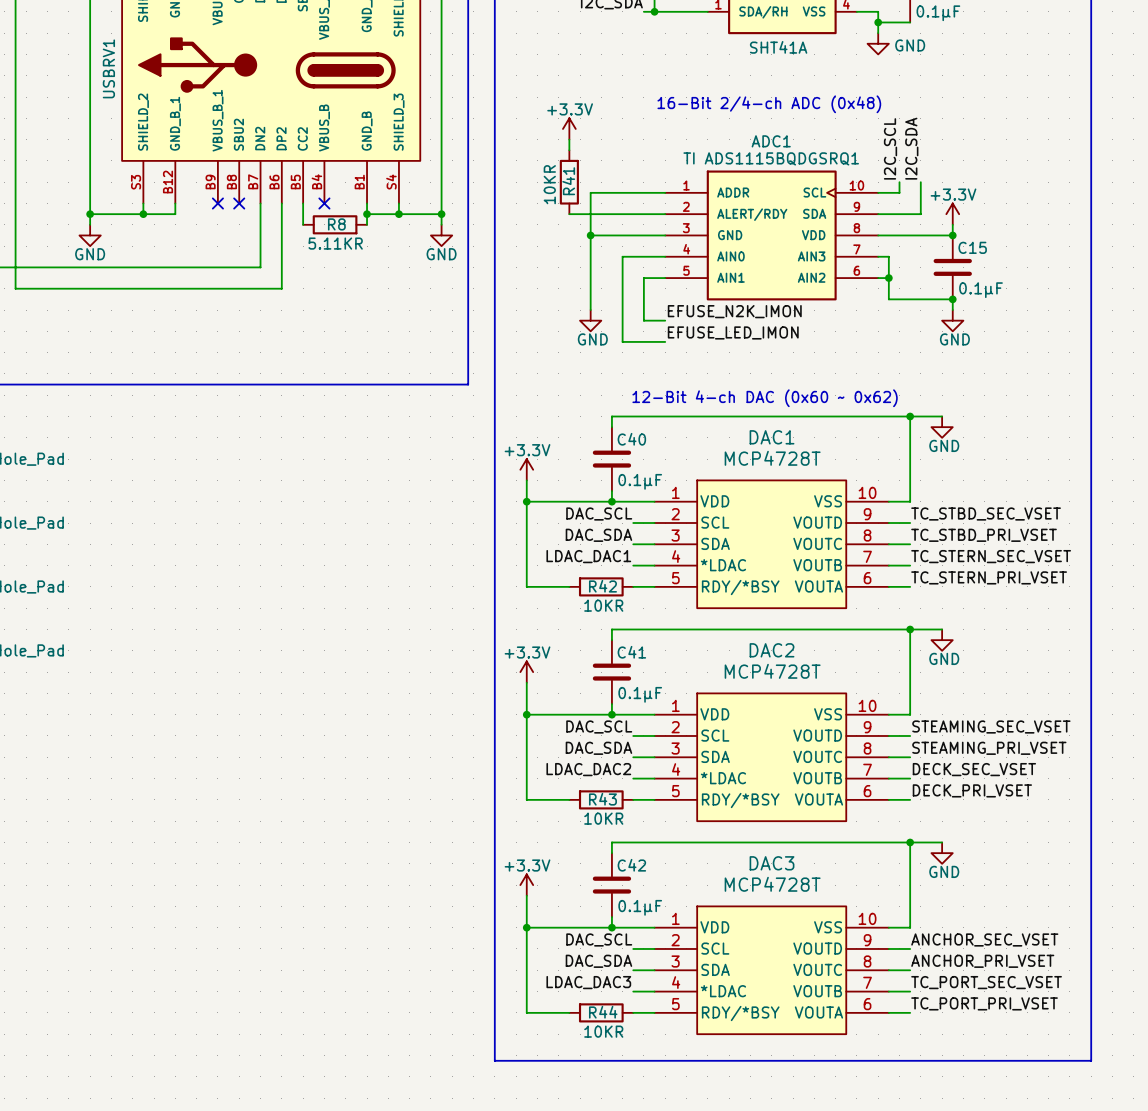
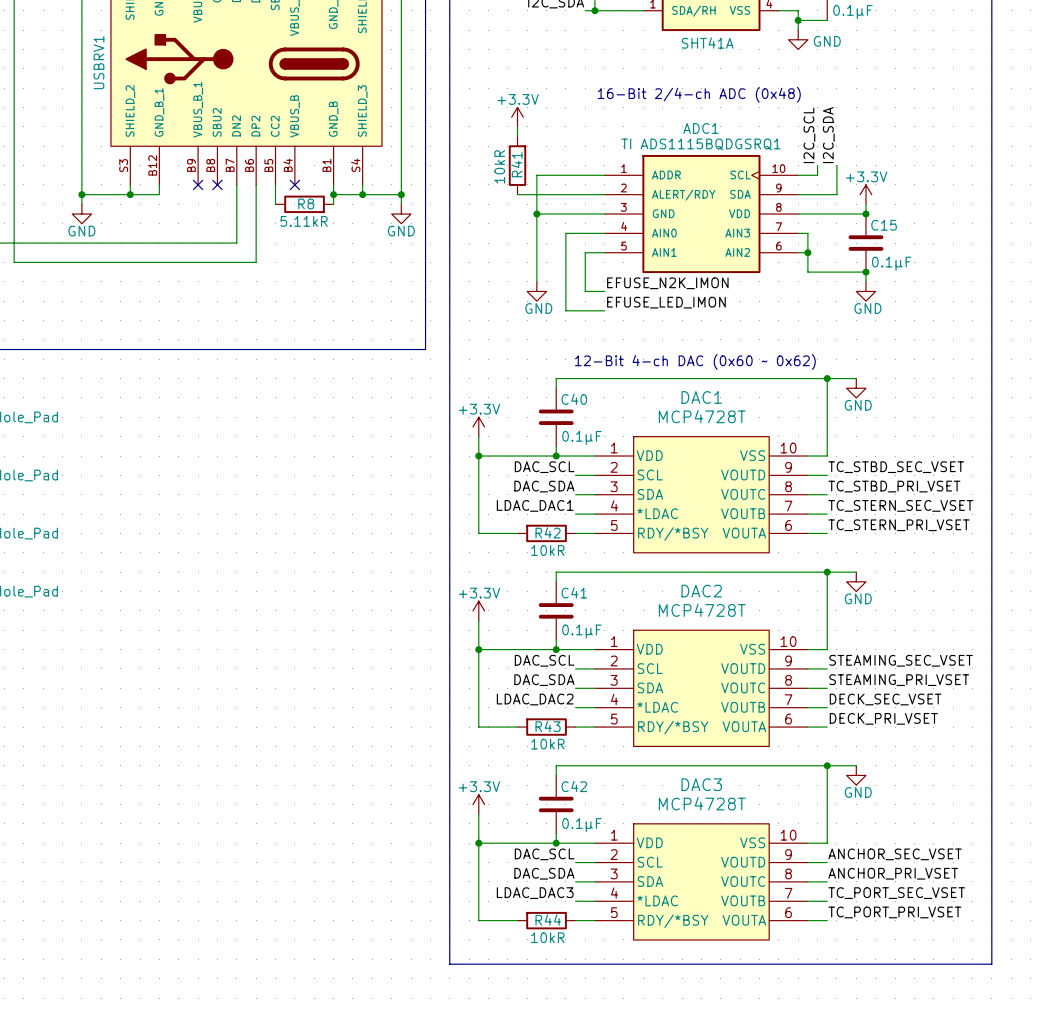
R41 value: 10KR (549, 184) -> 10kR (499, 166)
R8 value: 5.11KR (335, 243) -> 5.11kR (304, 221)
R42 value: 10KR (603, 605) -> 10kR (547, 550)
R43 value: 10KR (603, 818) -> 10kR (547, 744)
R44 value: 10KR (603, 1031) -> 10kR (547, 937)

